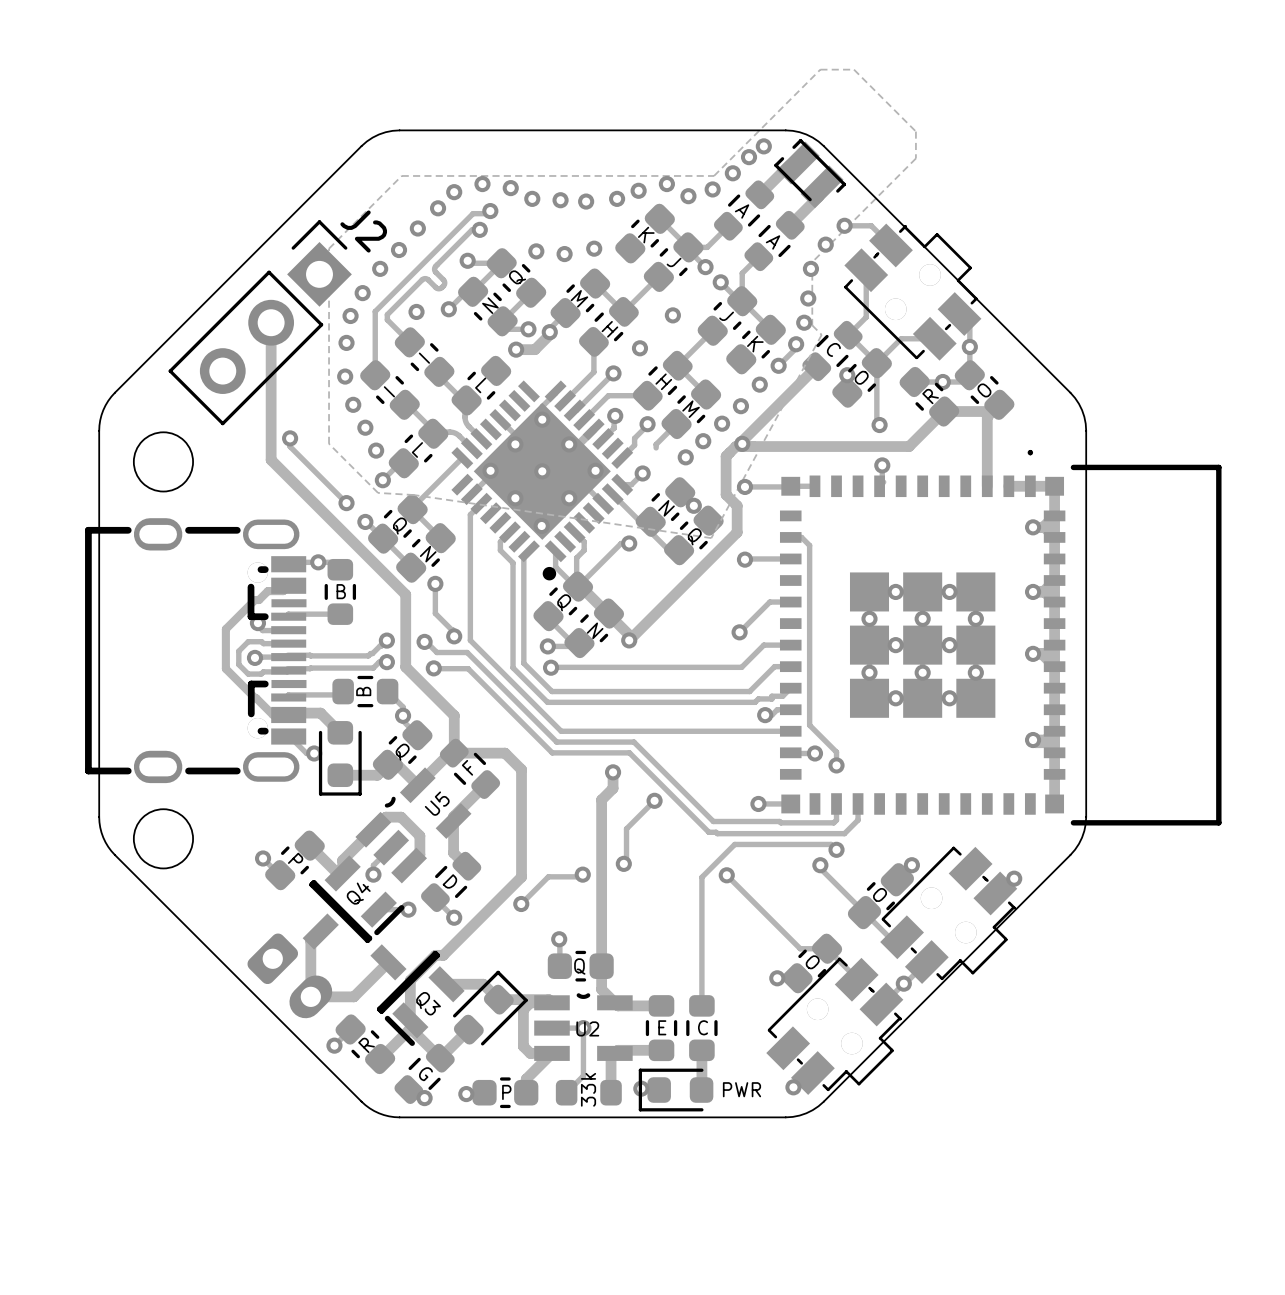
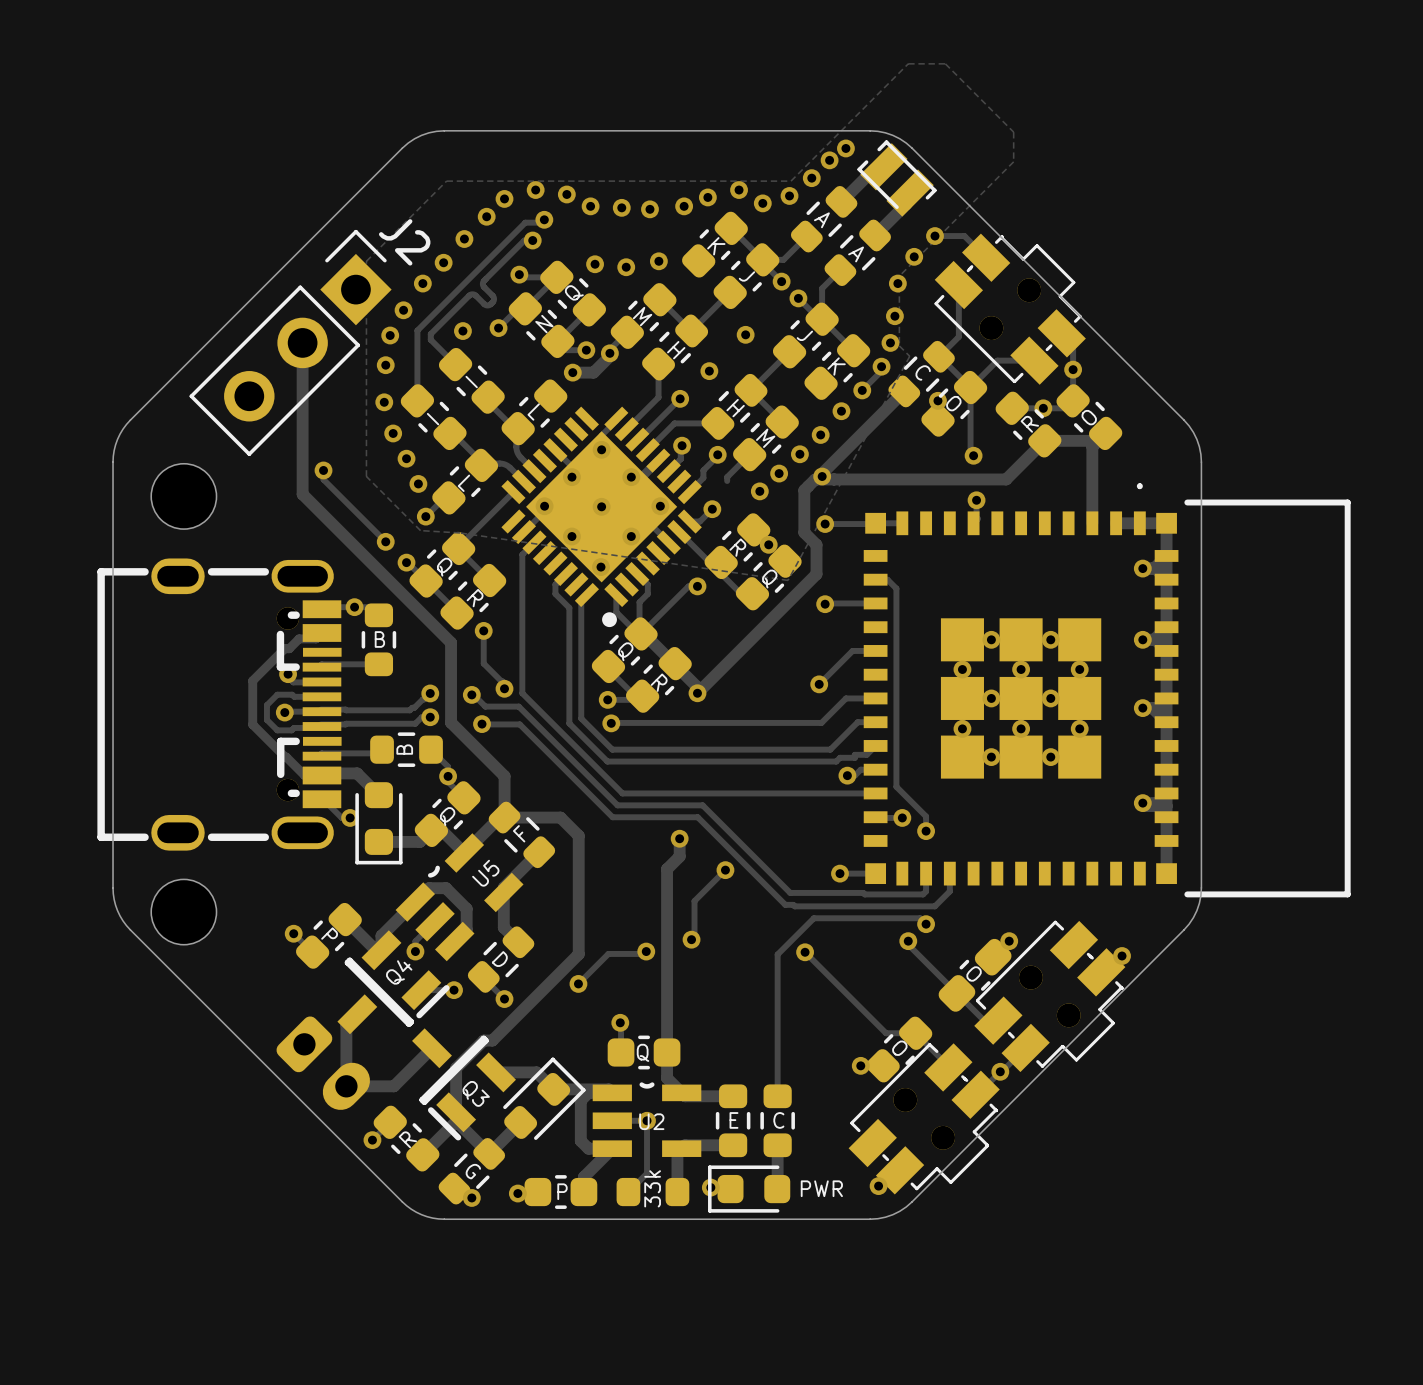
text: N (666, 508) -> R (737, 547)
text: N (428, 554) -> R (475, 598)
text: N (595, 630) -> R (659, 682)

